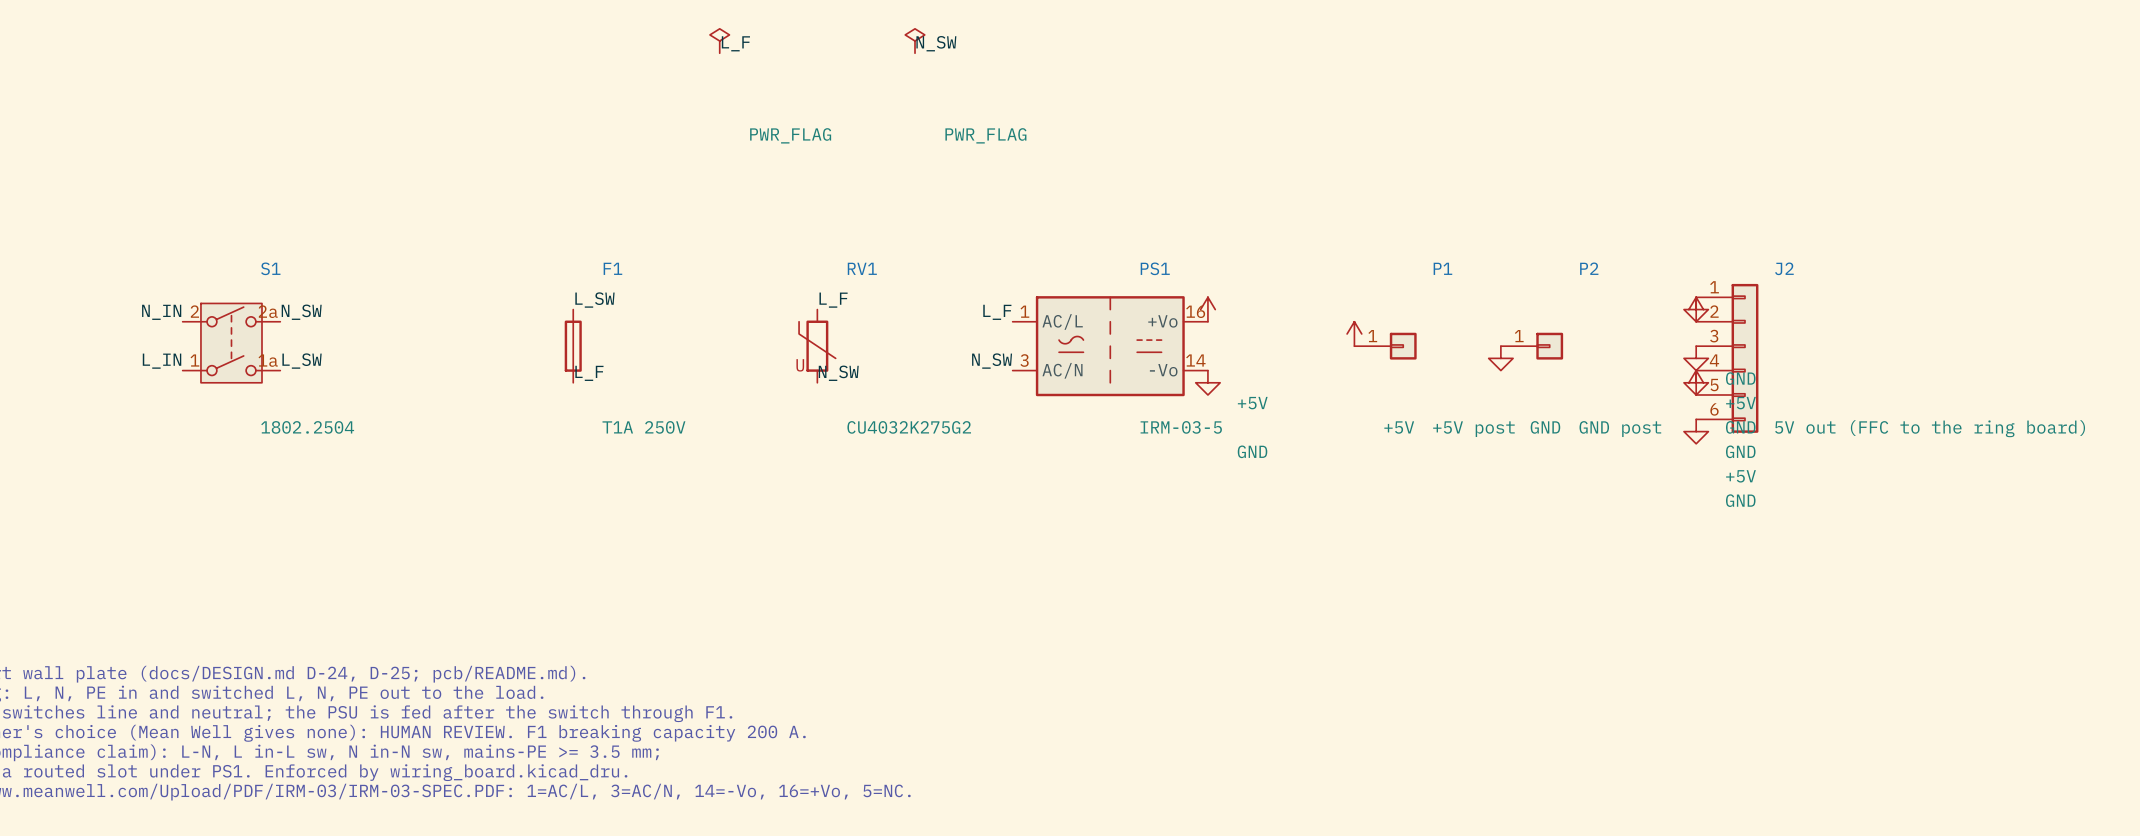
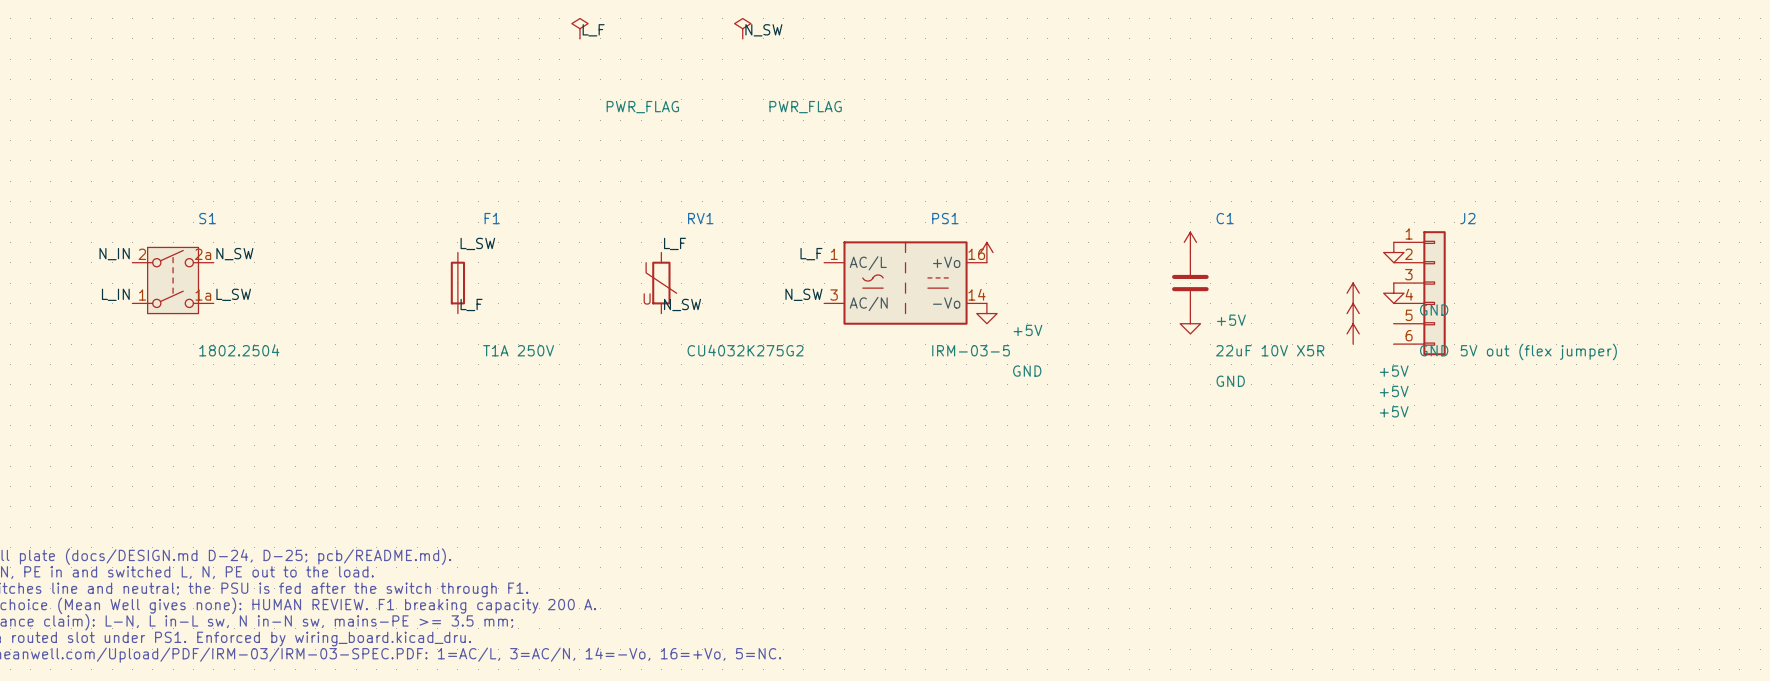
power symbol: +5V (1696, 309) -> none
power symbol position: +5V (1354, 333) -> +5V (1190, 242)
P1: +5V post (1385, 346) -> none
C1: none -> 22uF 10V X5R (1190, 283)
P2: GND post (1532, 346) -> none
power symbol position: GND (1500, 358) -> GND (1190, 323)
power symbol: none -> +5V (1353, 293)
power symbol: none -> +5V (1353, 313)
power symbol: GND (1696, 382) -> none
power symbol: +5V (1696, 382) -> none
power symbol: none -> +5V (1353, 333)
J2 value: 5V out (FFC to the ring board) (1930, 428) -> 5V out (flex jumper) (1538, 351)
power symbol: GND (1696, 431) -> none

